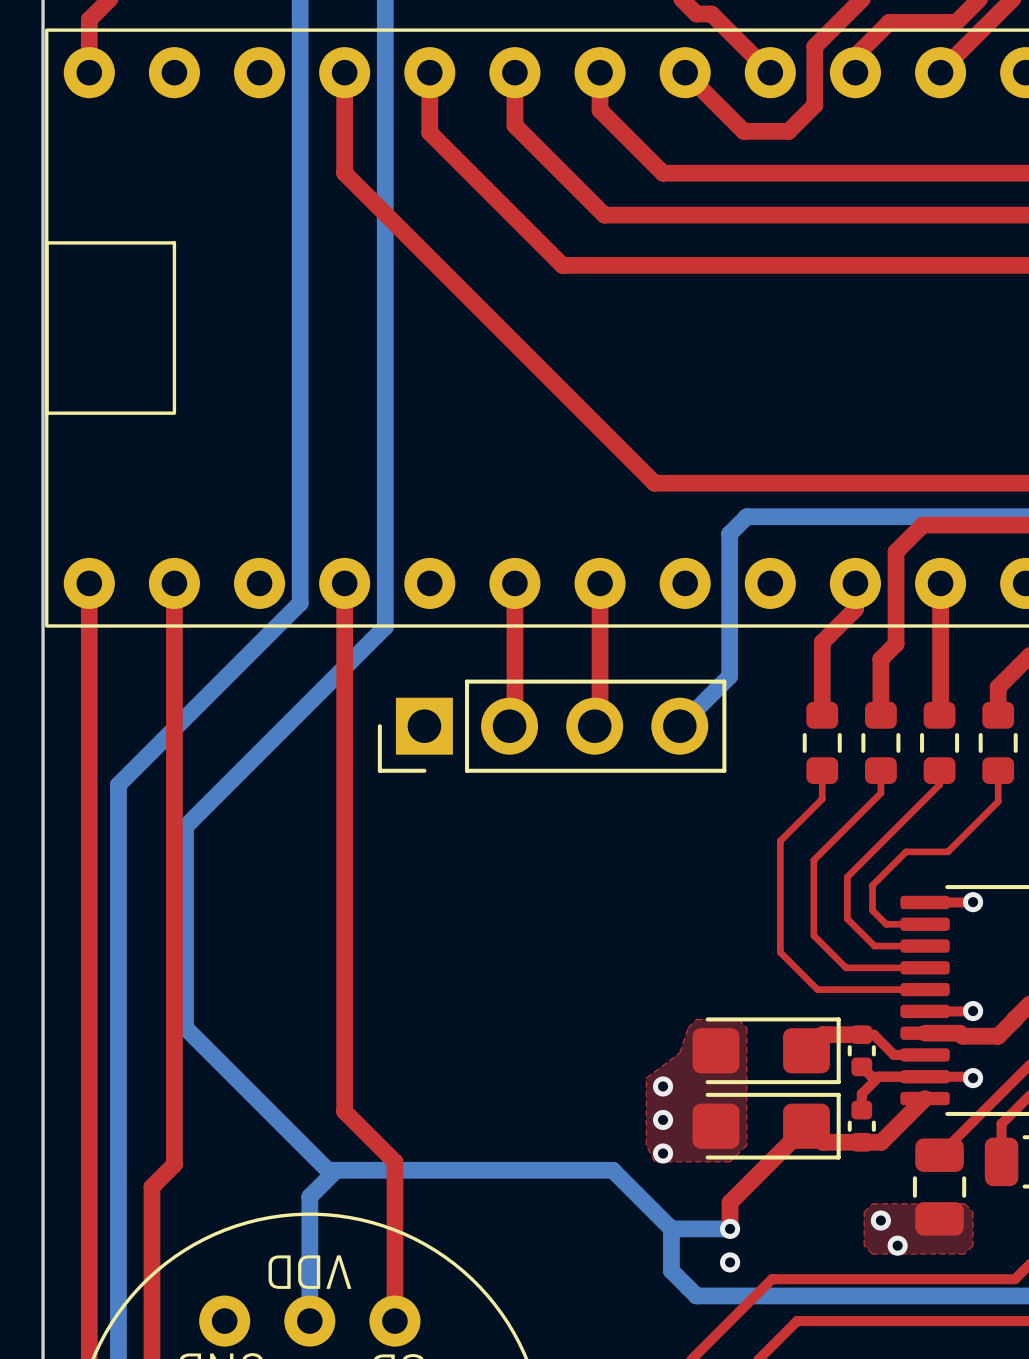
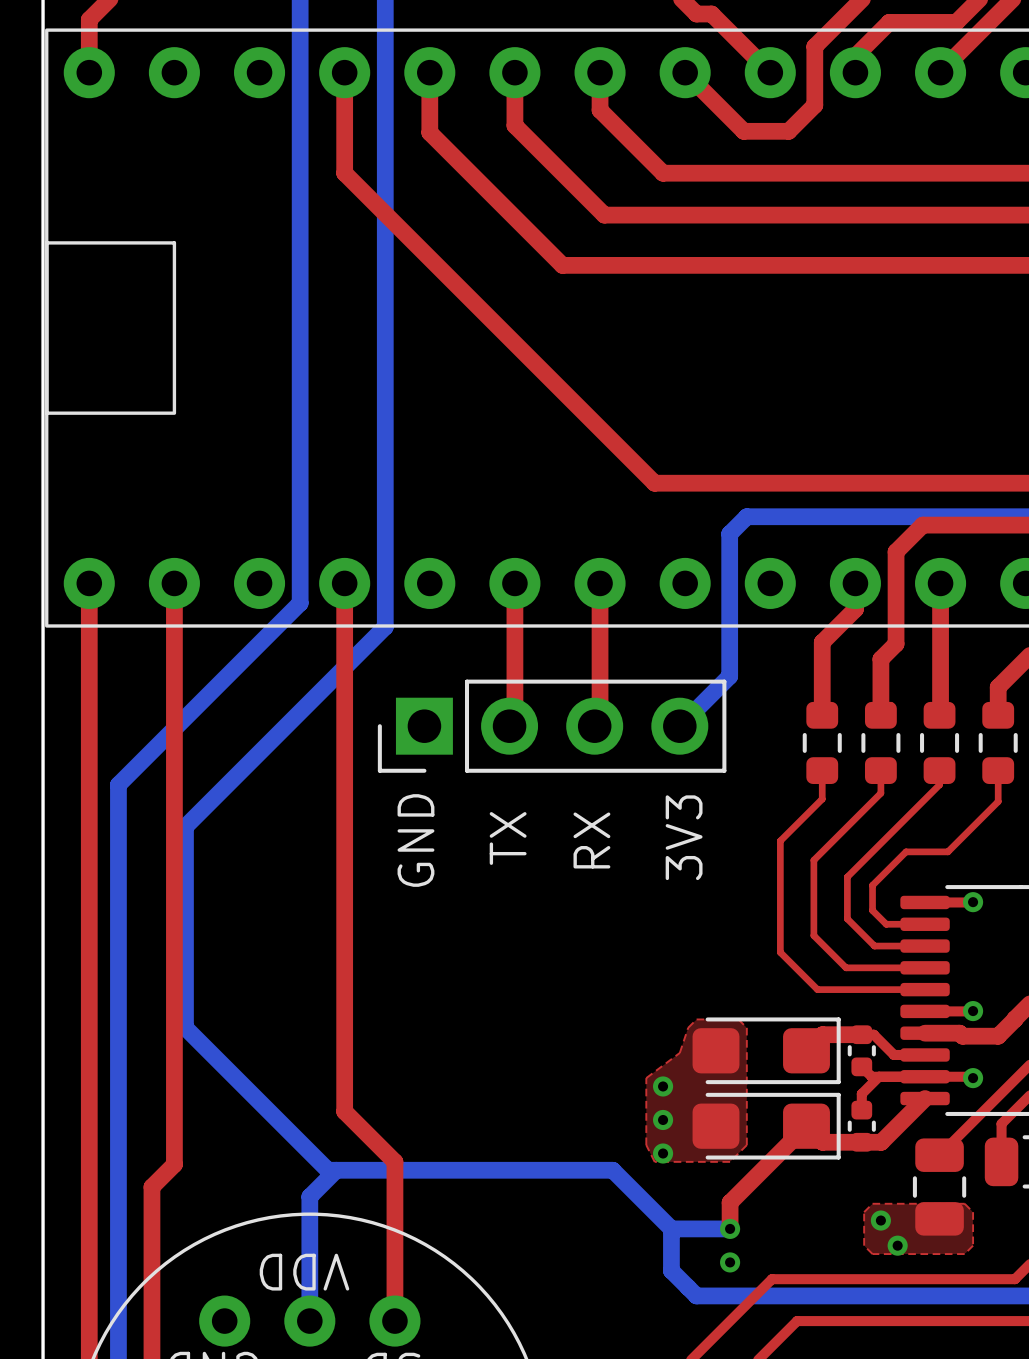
text: none -> TX (508, 838)
text: none -> RX (591, 840)
text: none -> 3V3 (684, 837)
text: none -> GND (415, 840)

